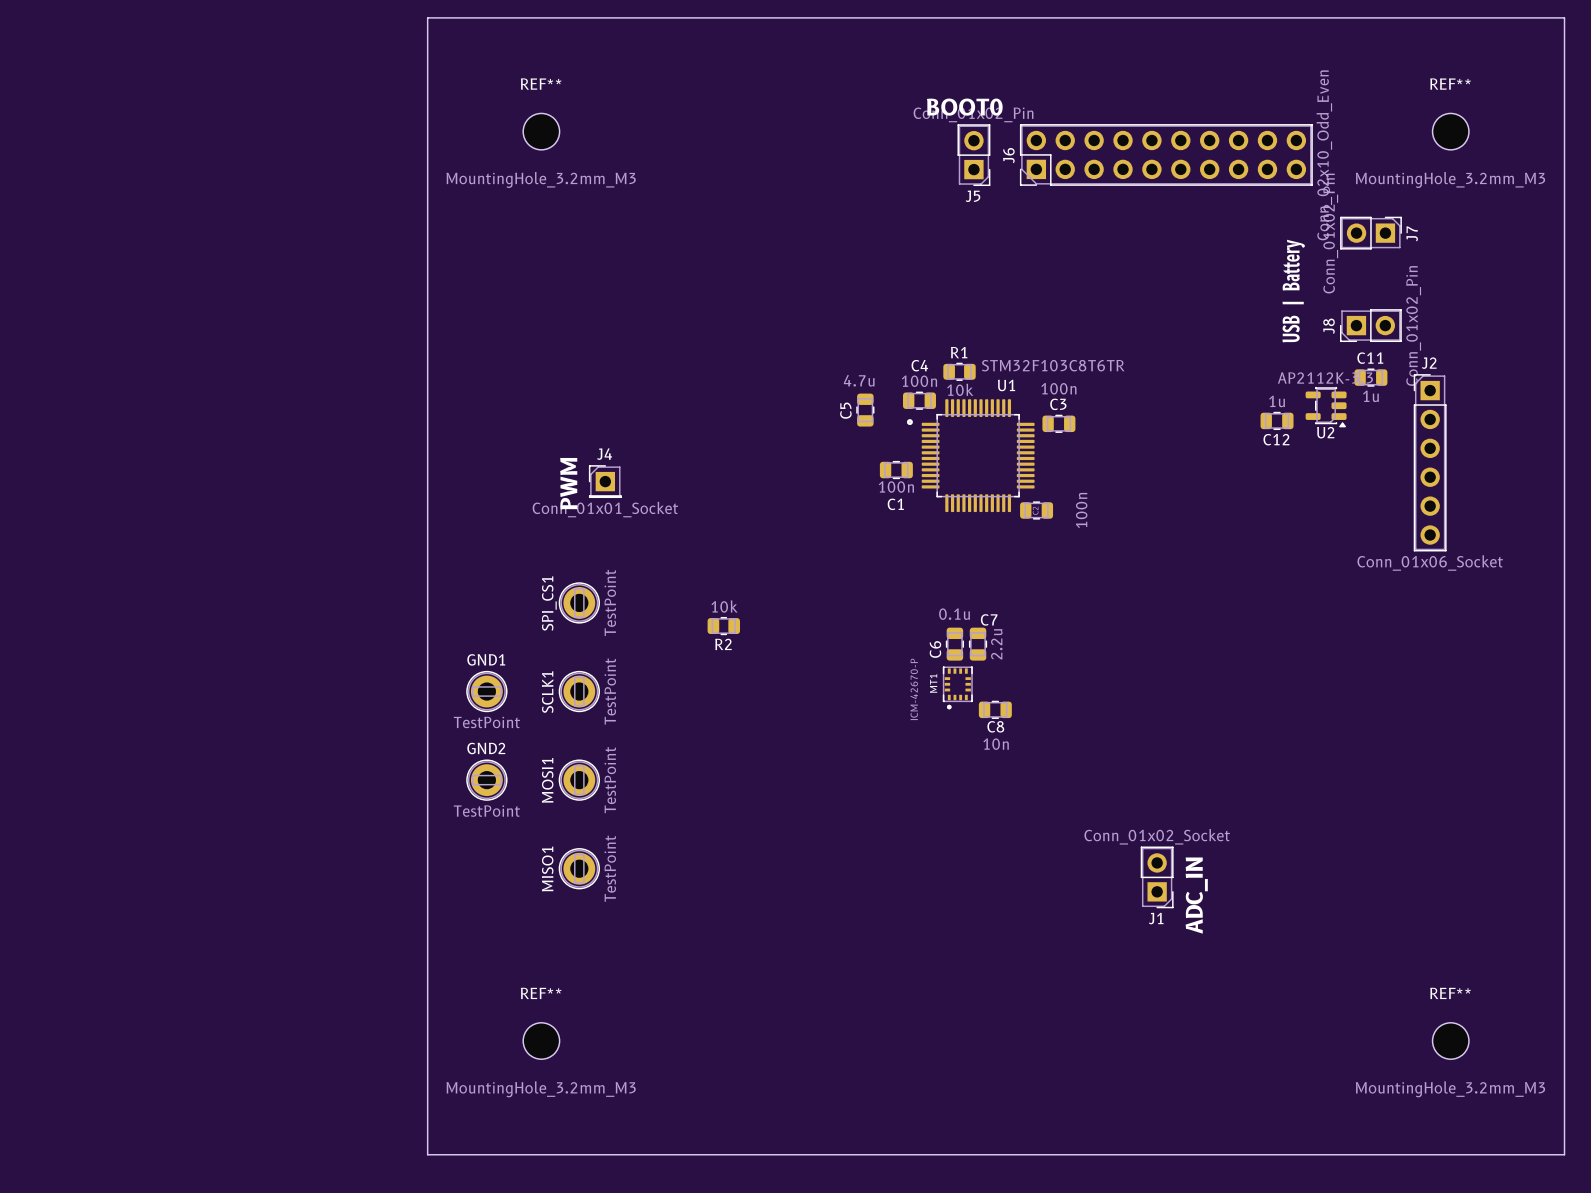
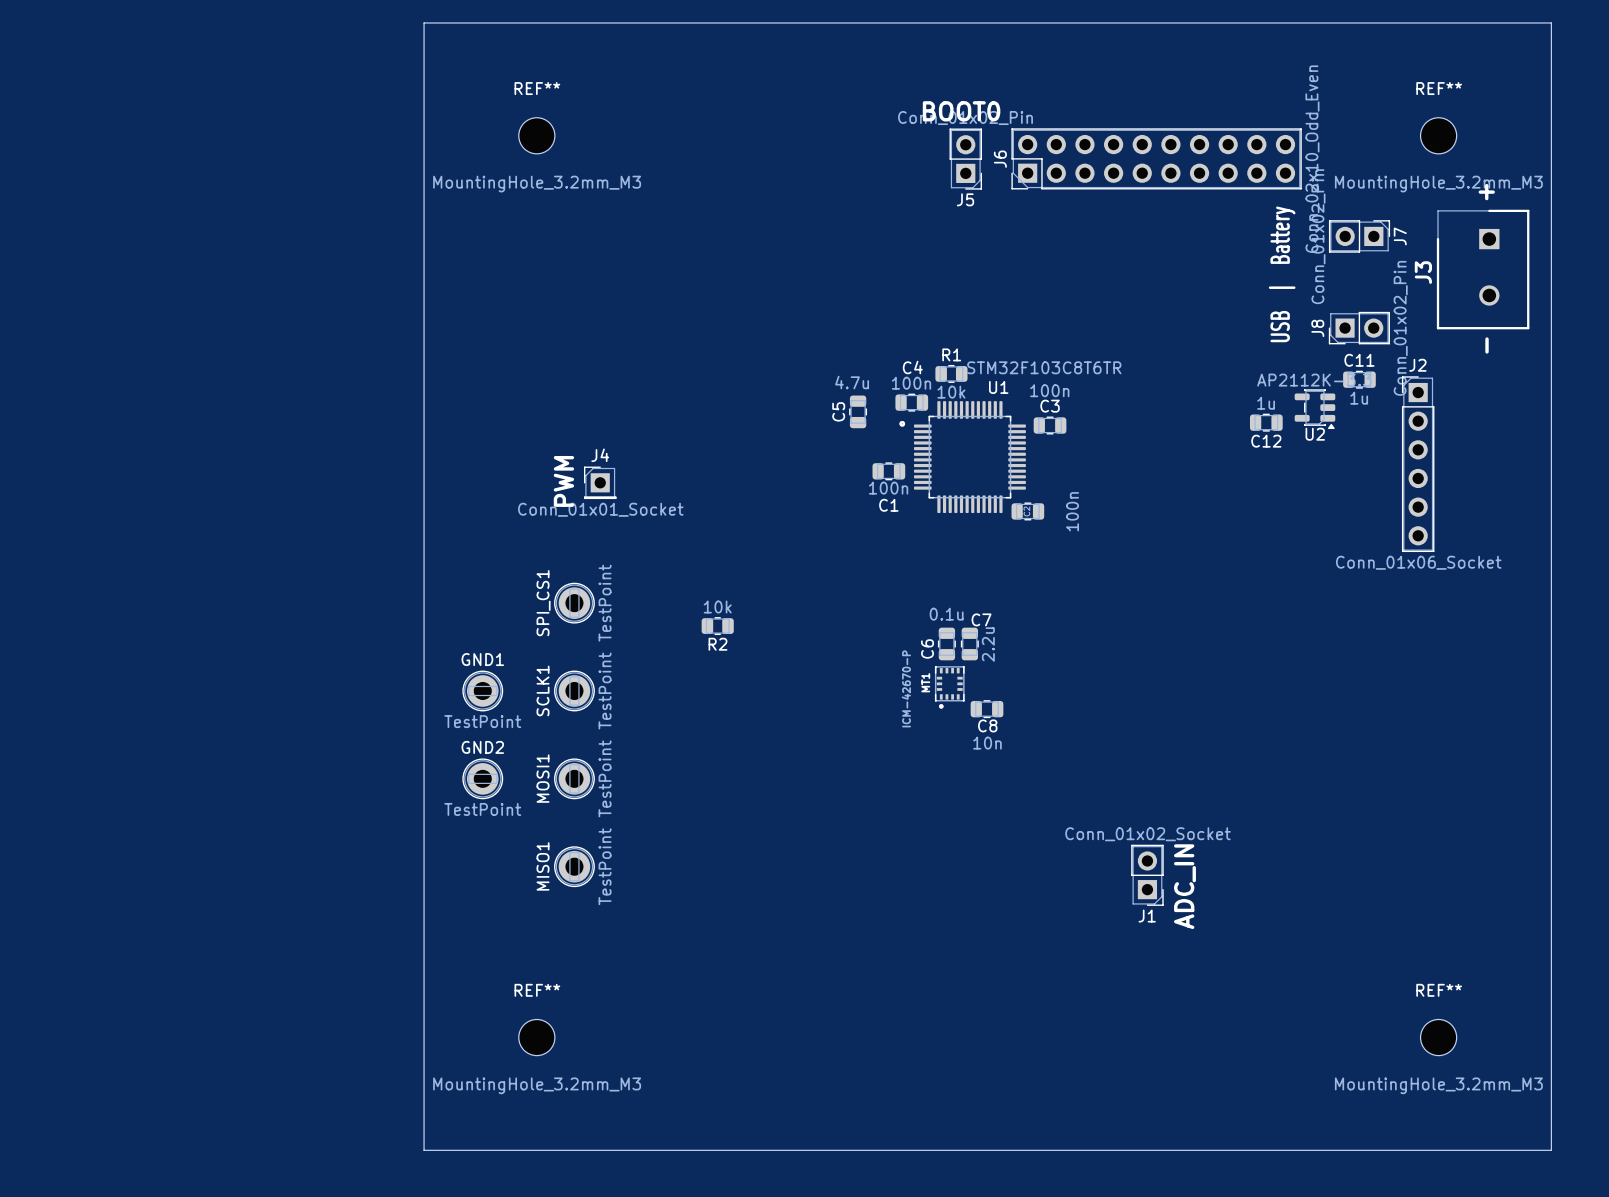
text: none -> + (1486, 192)
J3: none -> (1483, 269)
text: none -> - (1487, 345)

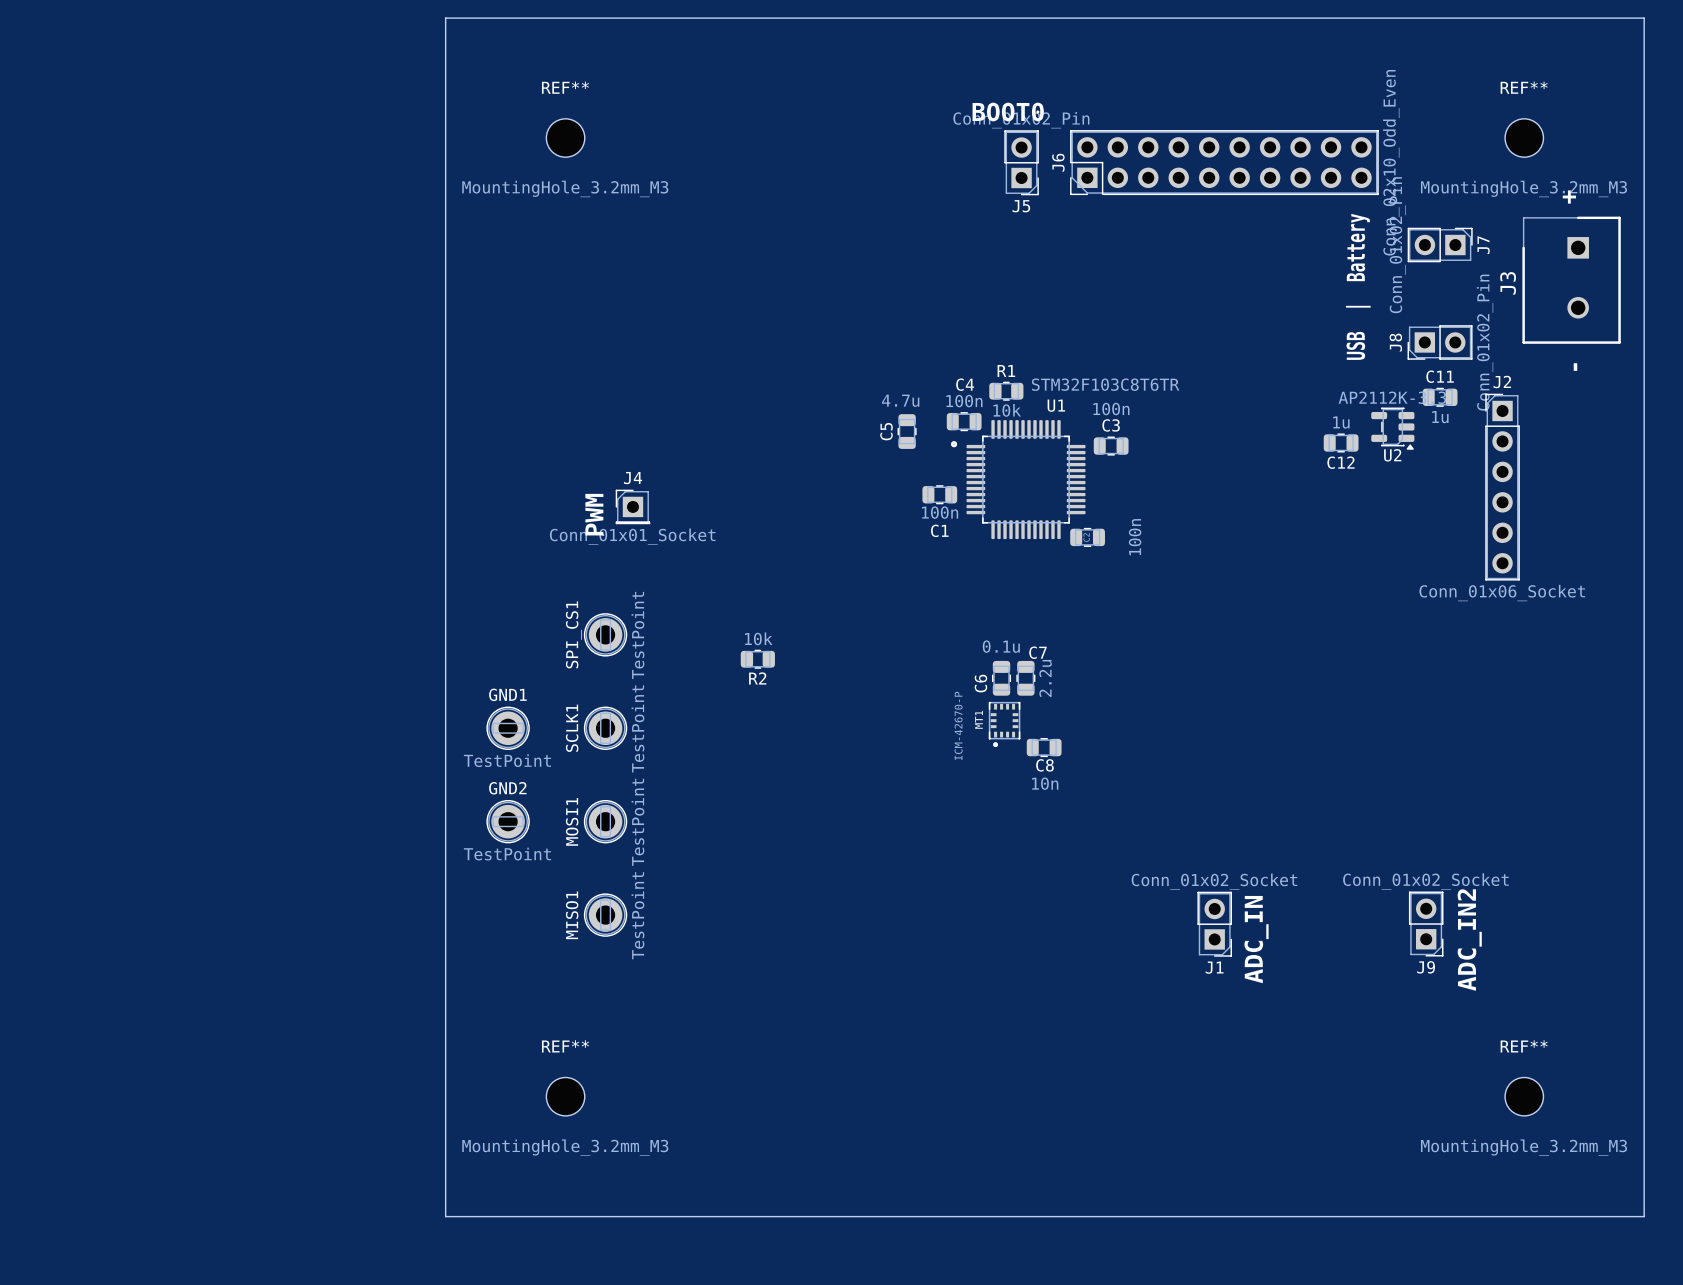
J9: none -> Conn_01x02_Socket (1426, 924)
text: none -> ADC_IN2 (1469, 940)

